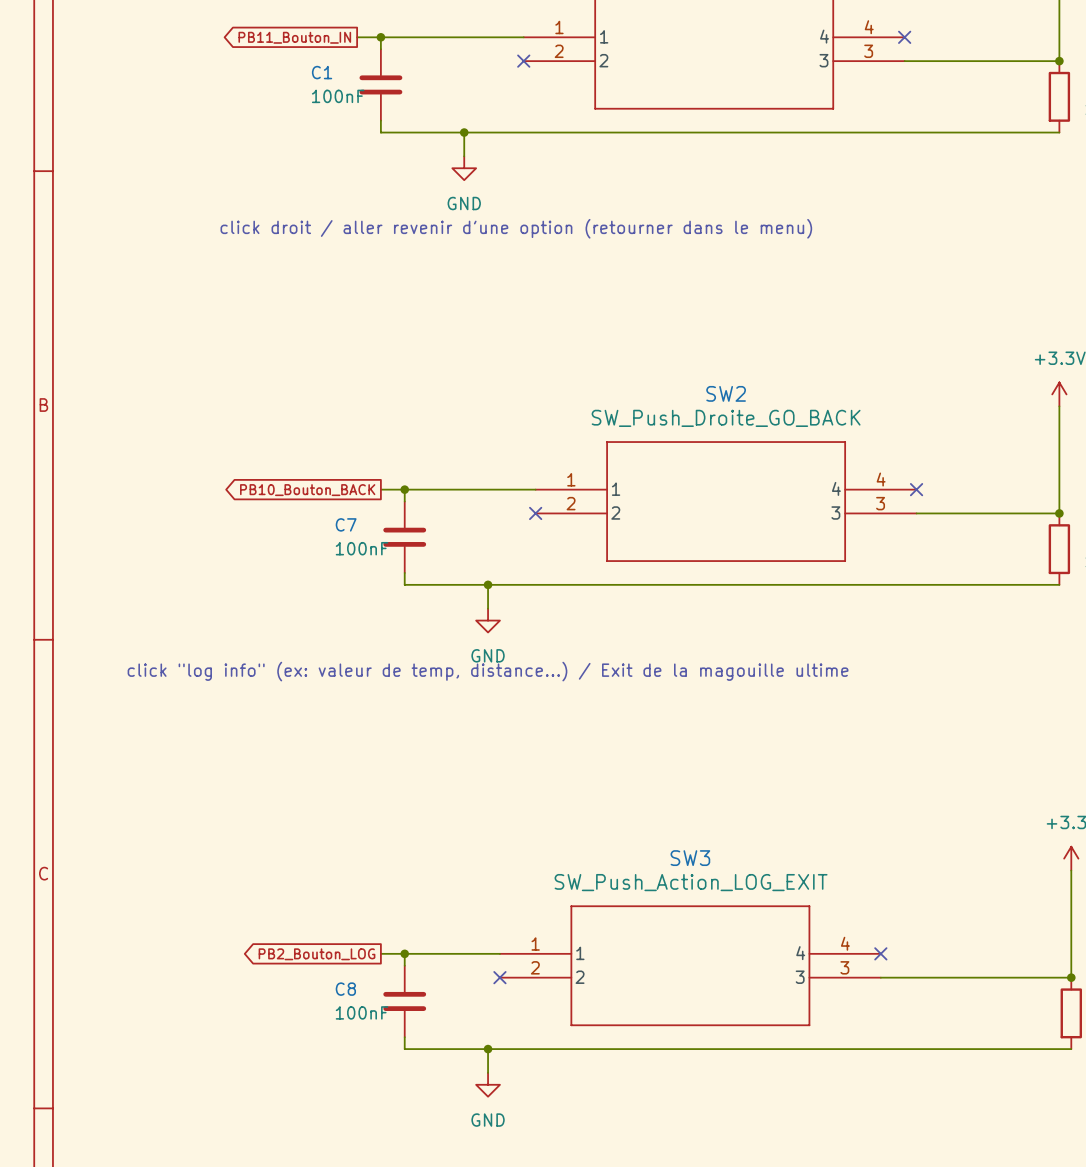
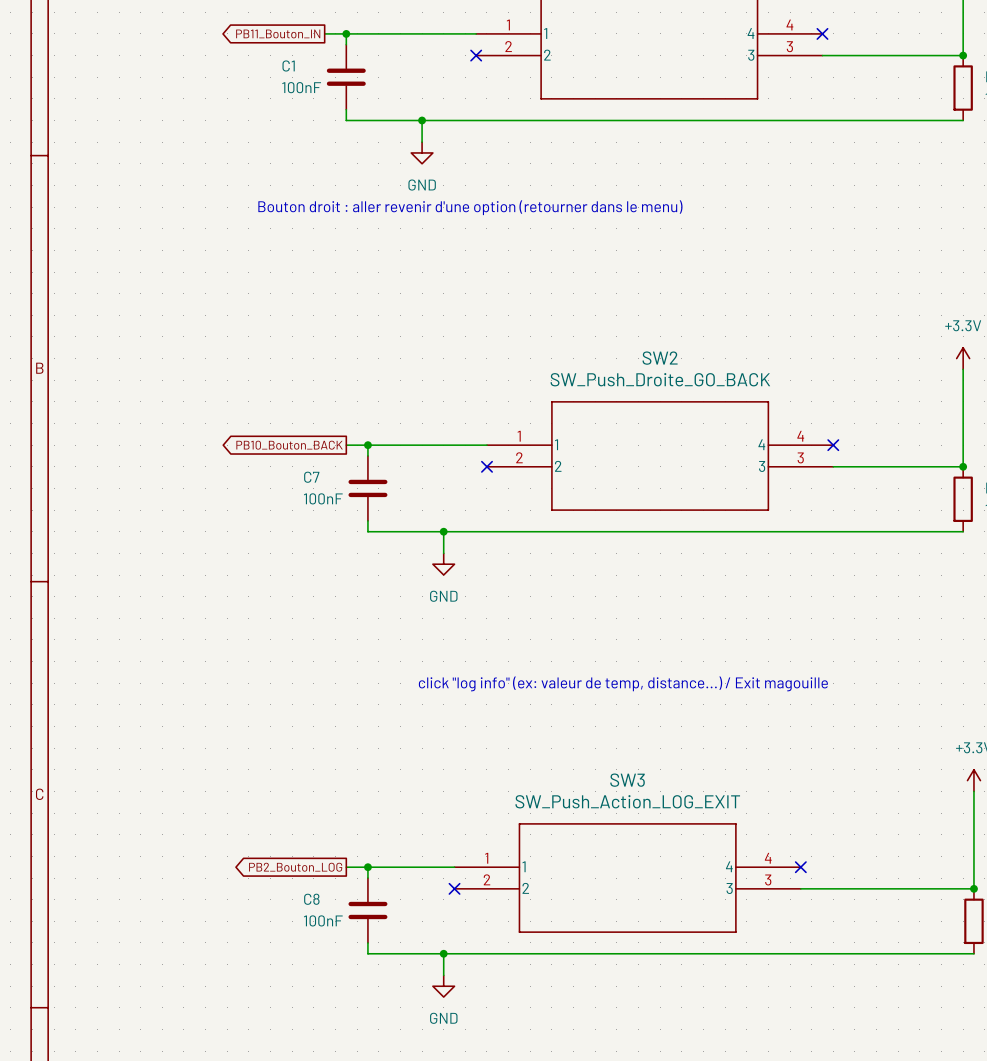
text: click droit / aller revenir d'une option (retourner dans le menu) (516, 228) -> Bouton droit : aller revenir d'une option (retourner dans le menu) (470, 207)
text: click "log info" (ex: valeur de temp, distance...) / Exit de la magouille ultime (488, 671) -> none
text: none -> click "log info" (ex: valeur de temp, distance...) / Exit magouille (623, 683)

